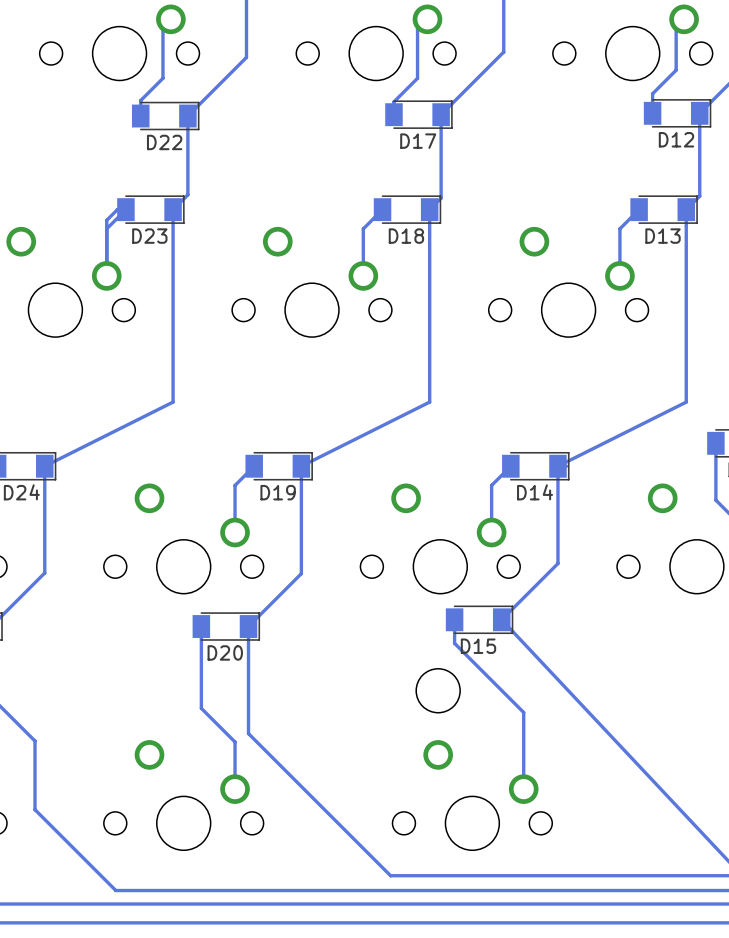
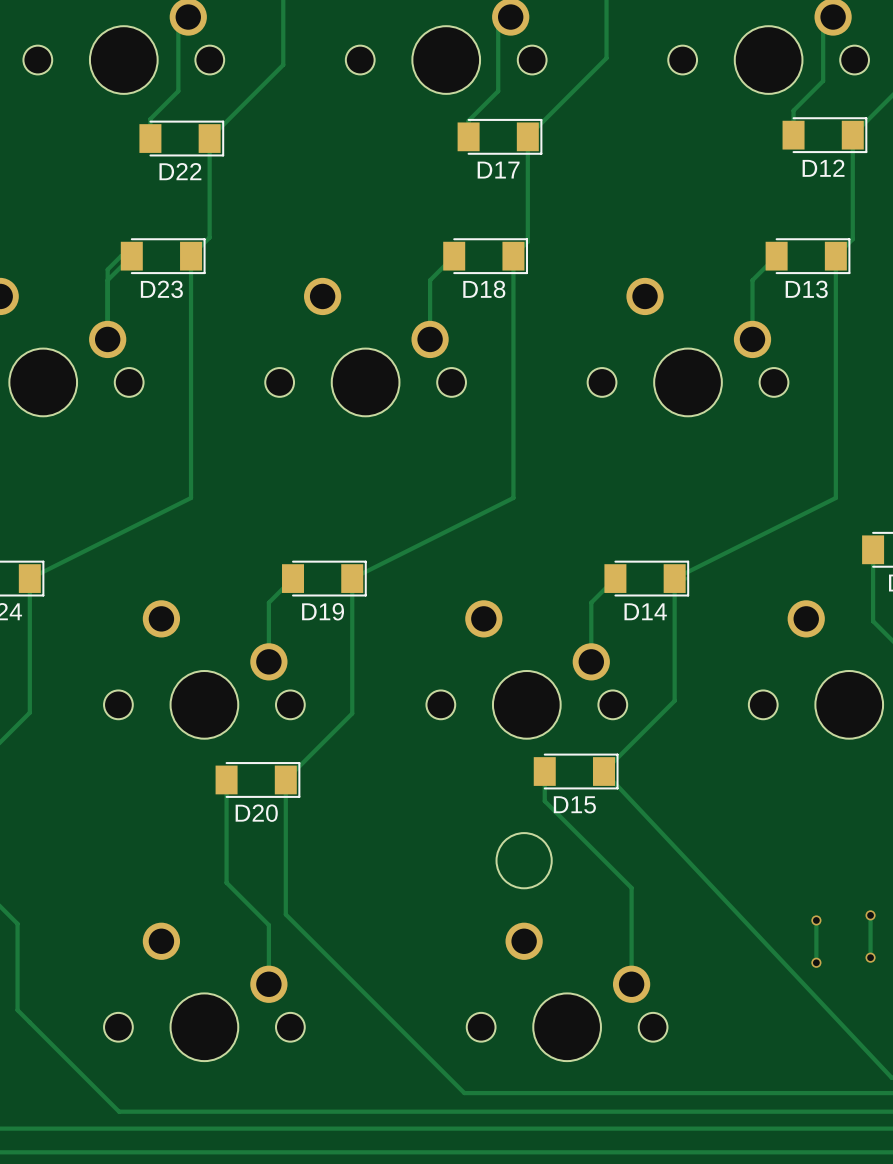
track: none -> (870, 915) (870, 957)
via: none -> (870, 915)
track: none -> (816, 920) (816, 962)
via: none -> (816, 920)
via: none -> (870, 957)
via: none -> (816, 962)

